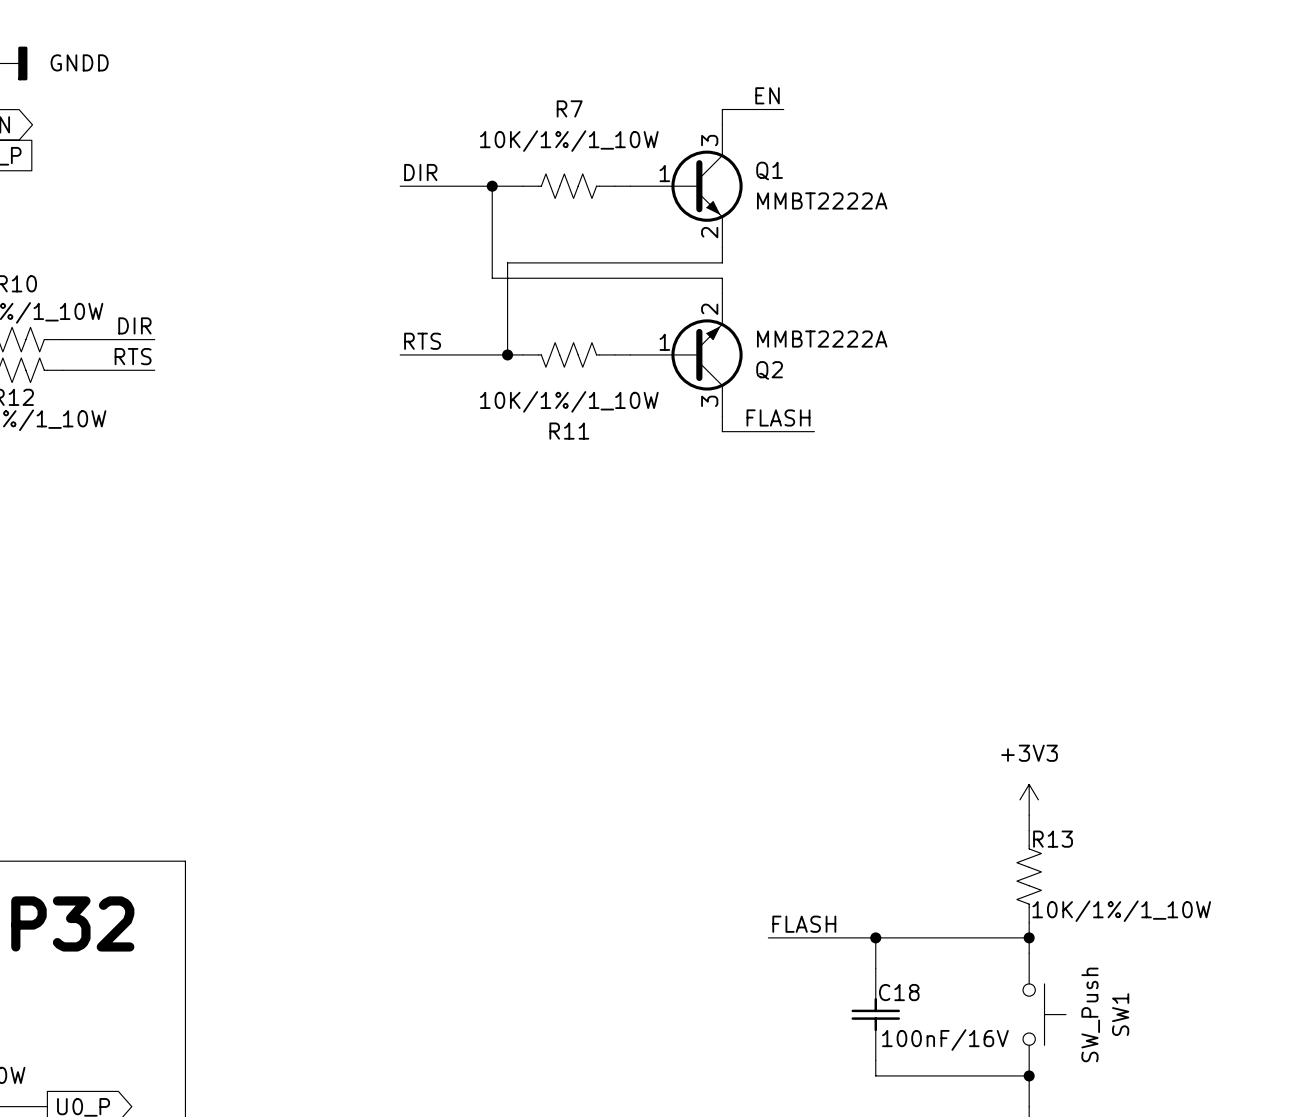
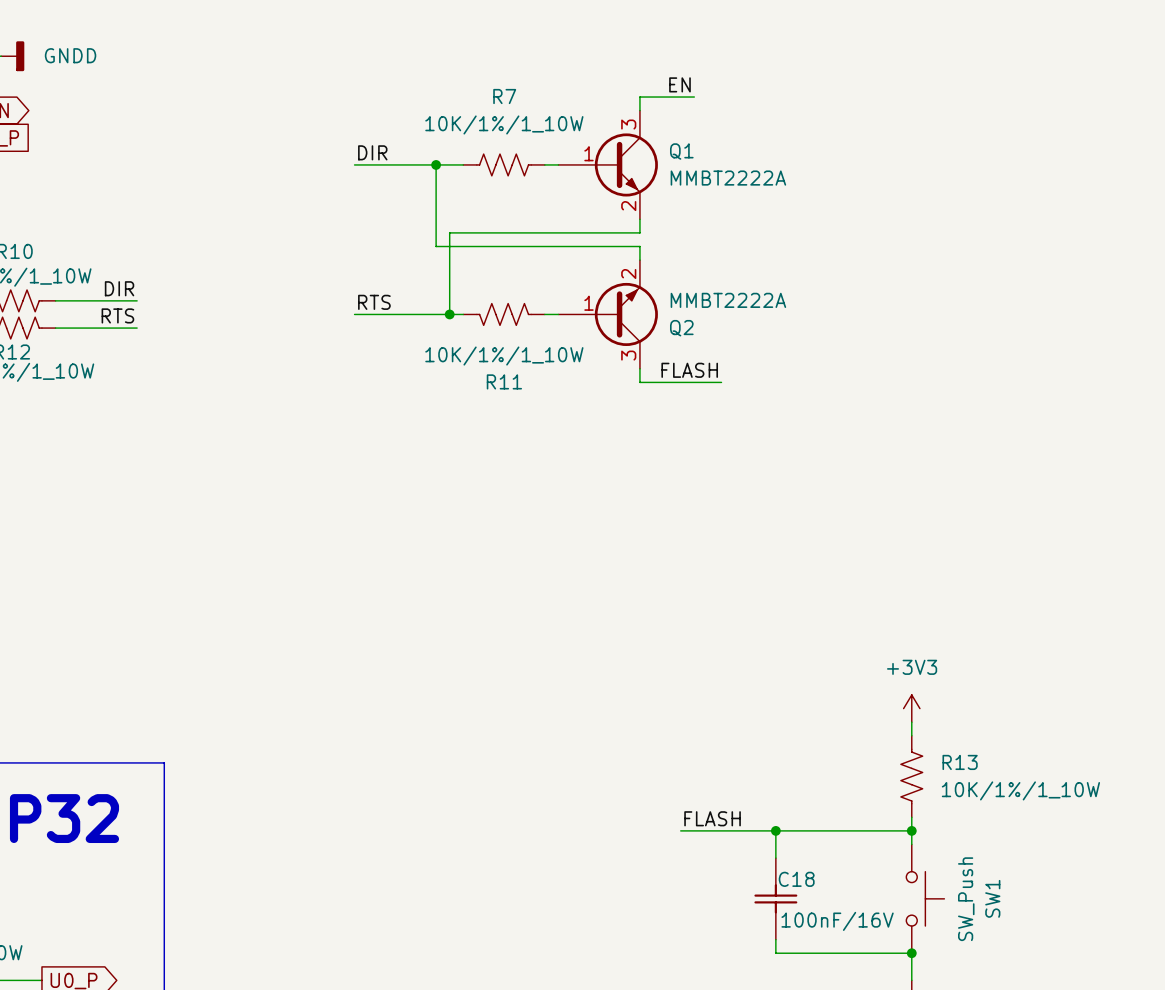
R13 name position: R13 (1053, 839) -> R13 (960, 762)
R13 value position: 10K/1%/1_10W (1121, 911) -> 10K/1%/1_10W (1020, 790)

